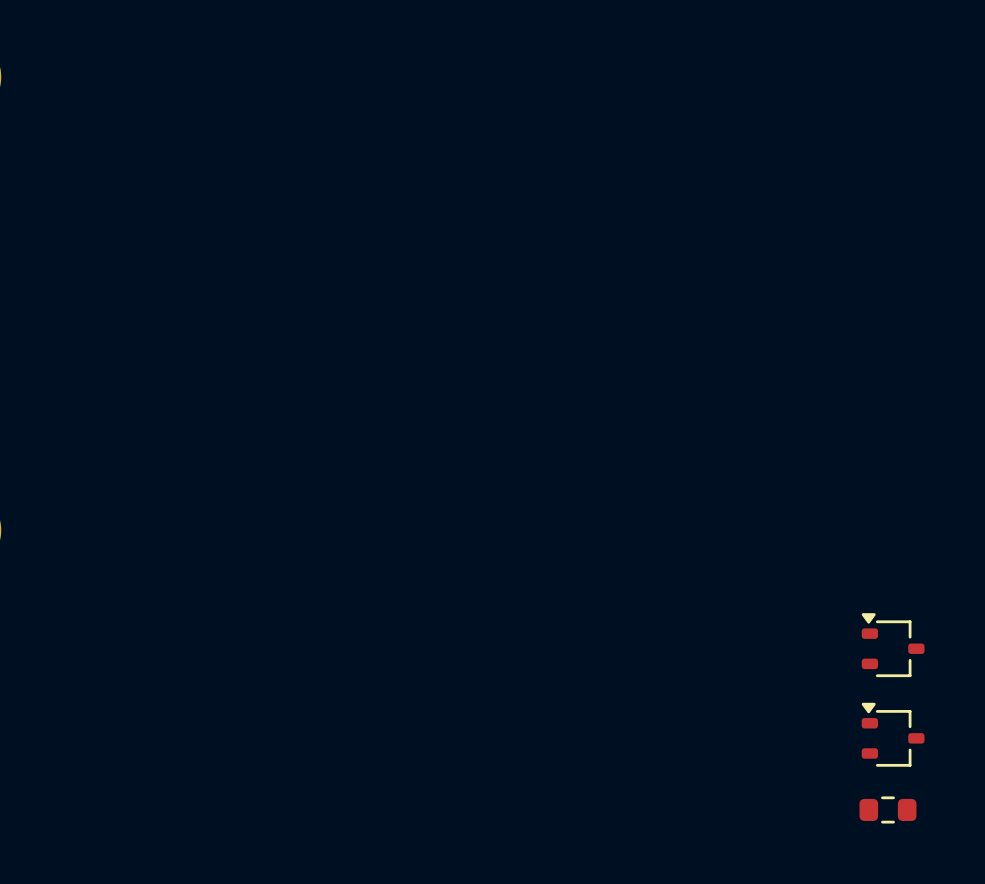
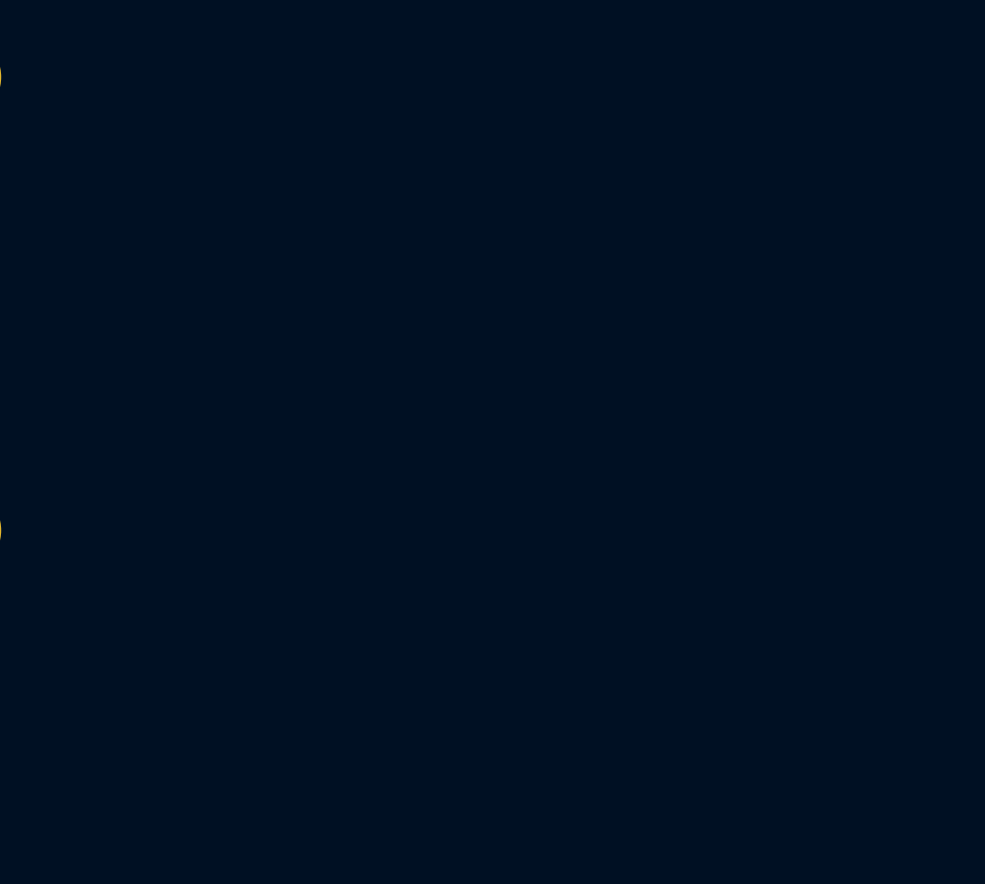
part: (893, 645) -> none
part: (893, 734) -> none
part: (887, 809) -> none

